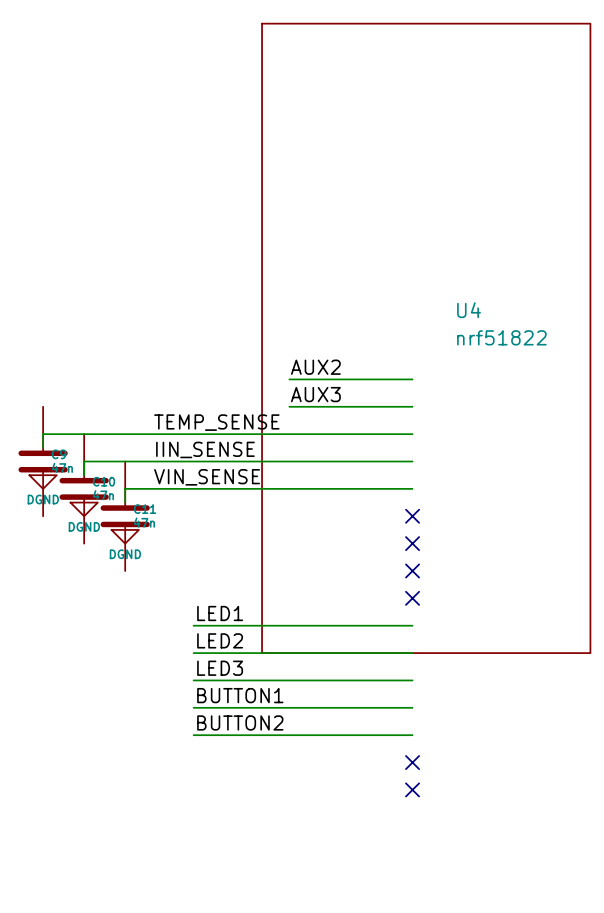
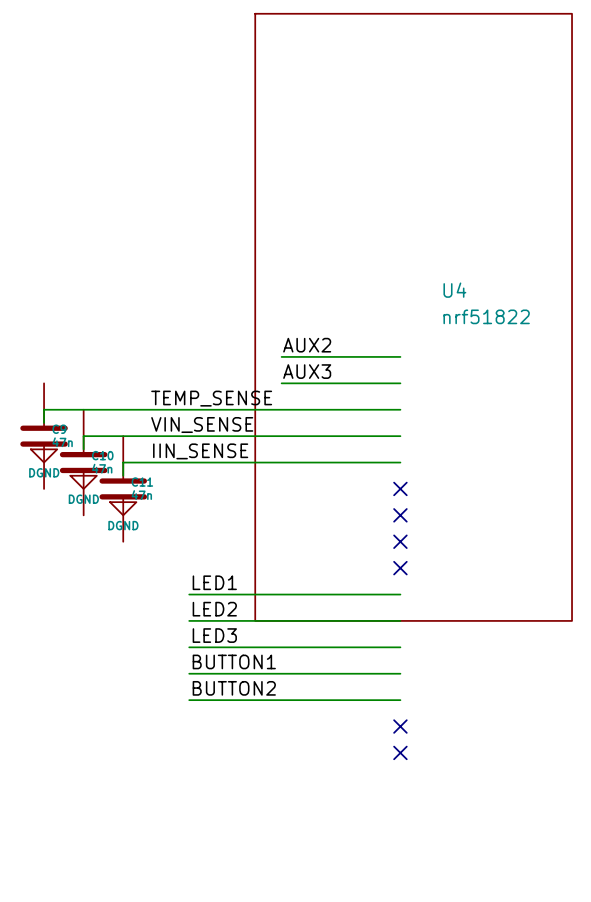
label: IIN_SENSE (205, 449) -> VIN_SENSE (202, 425)
label: VIN_SENSE (207, 477) -> IIN_SENSE (200, 451)

